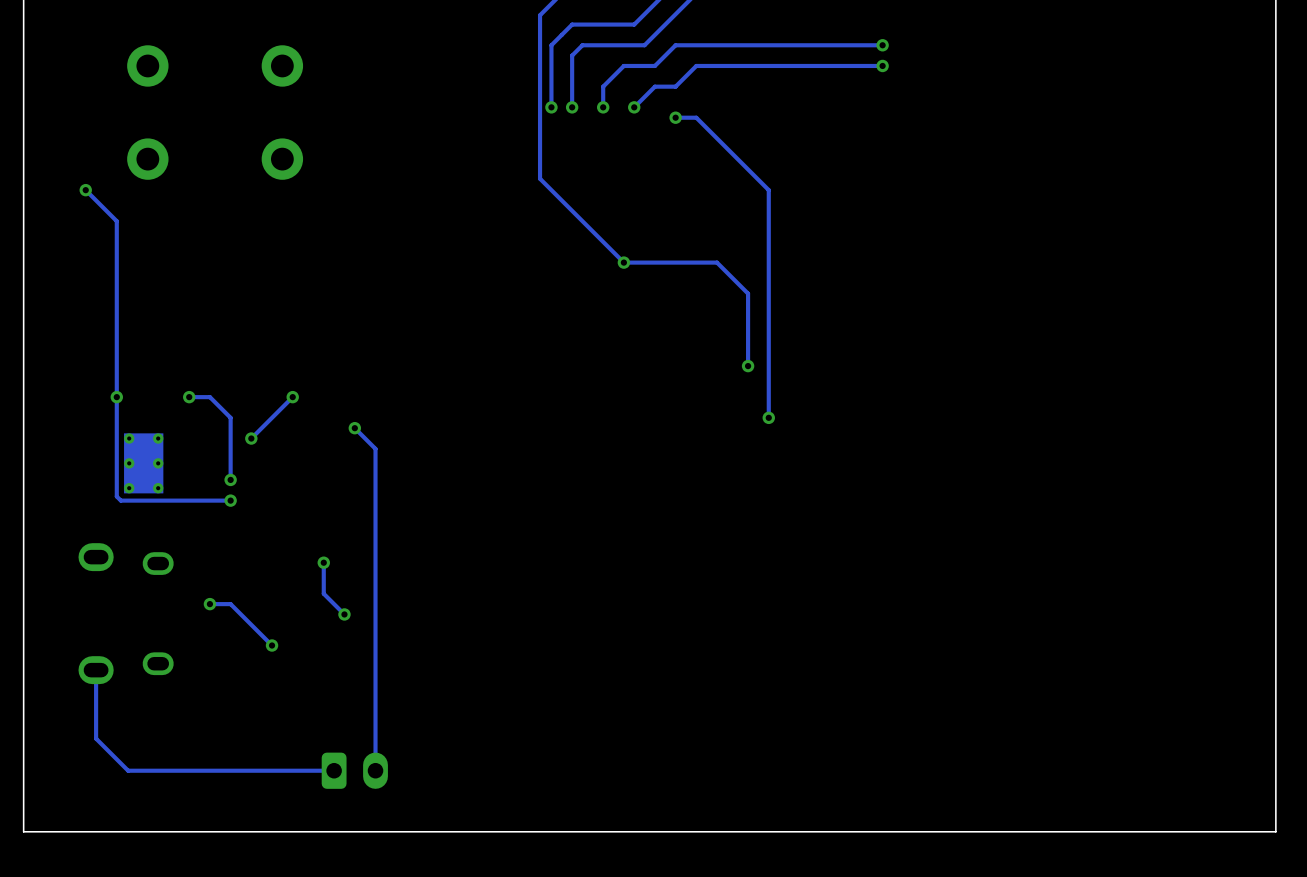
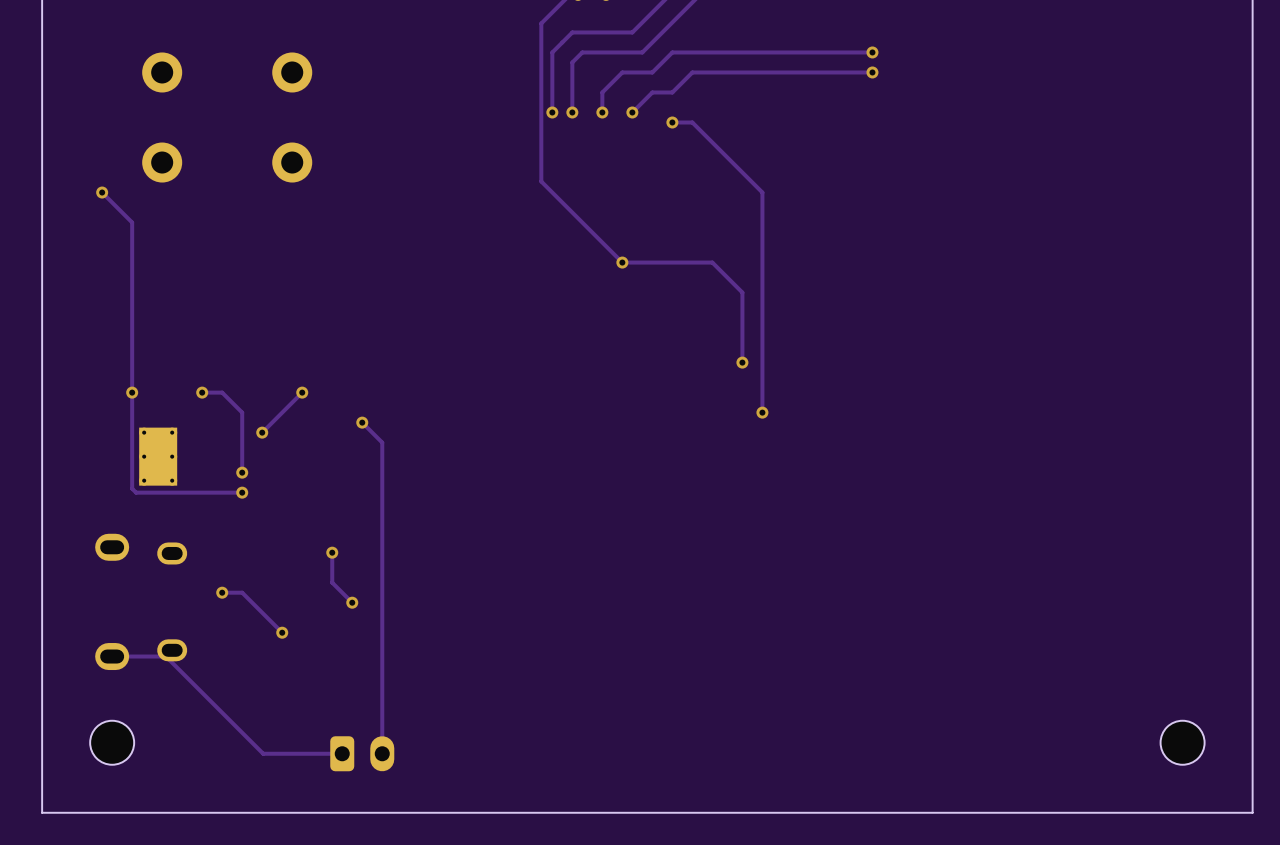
track: (96, 670) (96, 738) (128, 770) (252, 770) -> (112, 656) (165, 656) (263, 753)
part: none -> (112, 742)
part: none -> (1182, 742)

